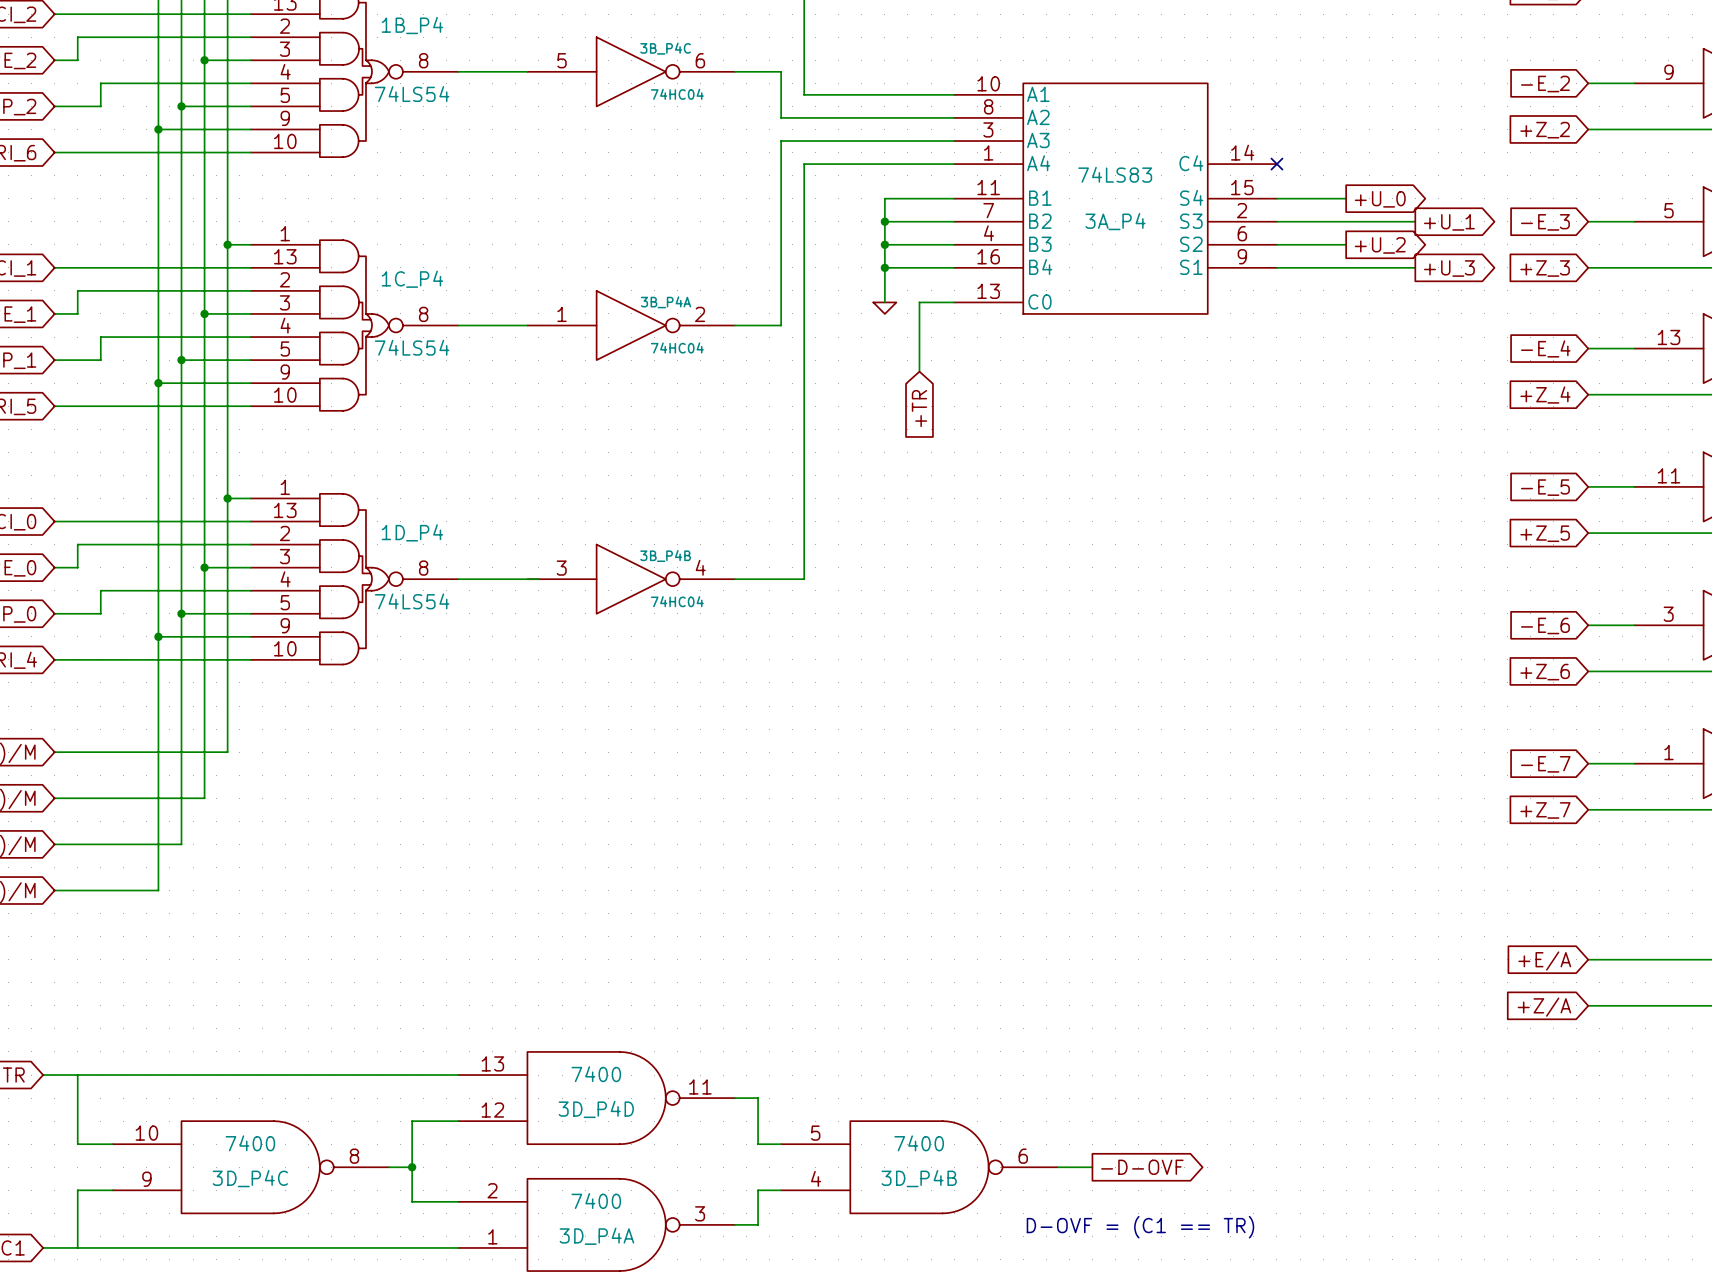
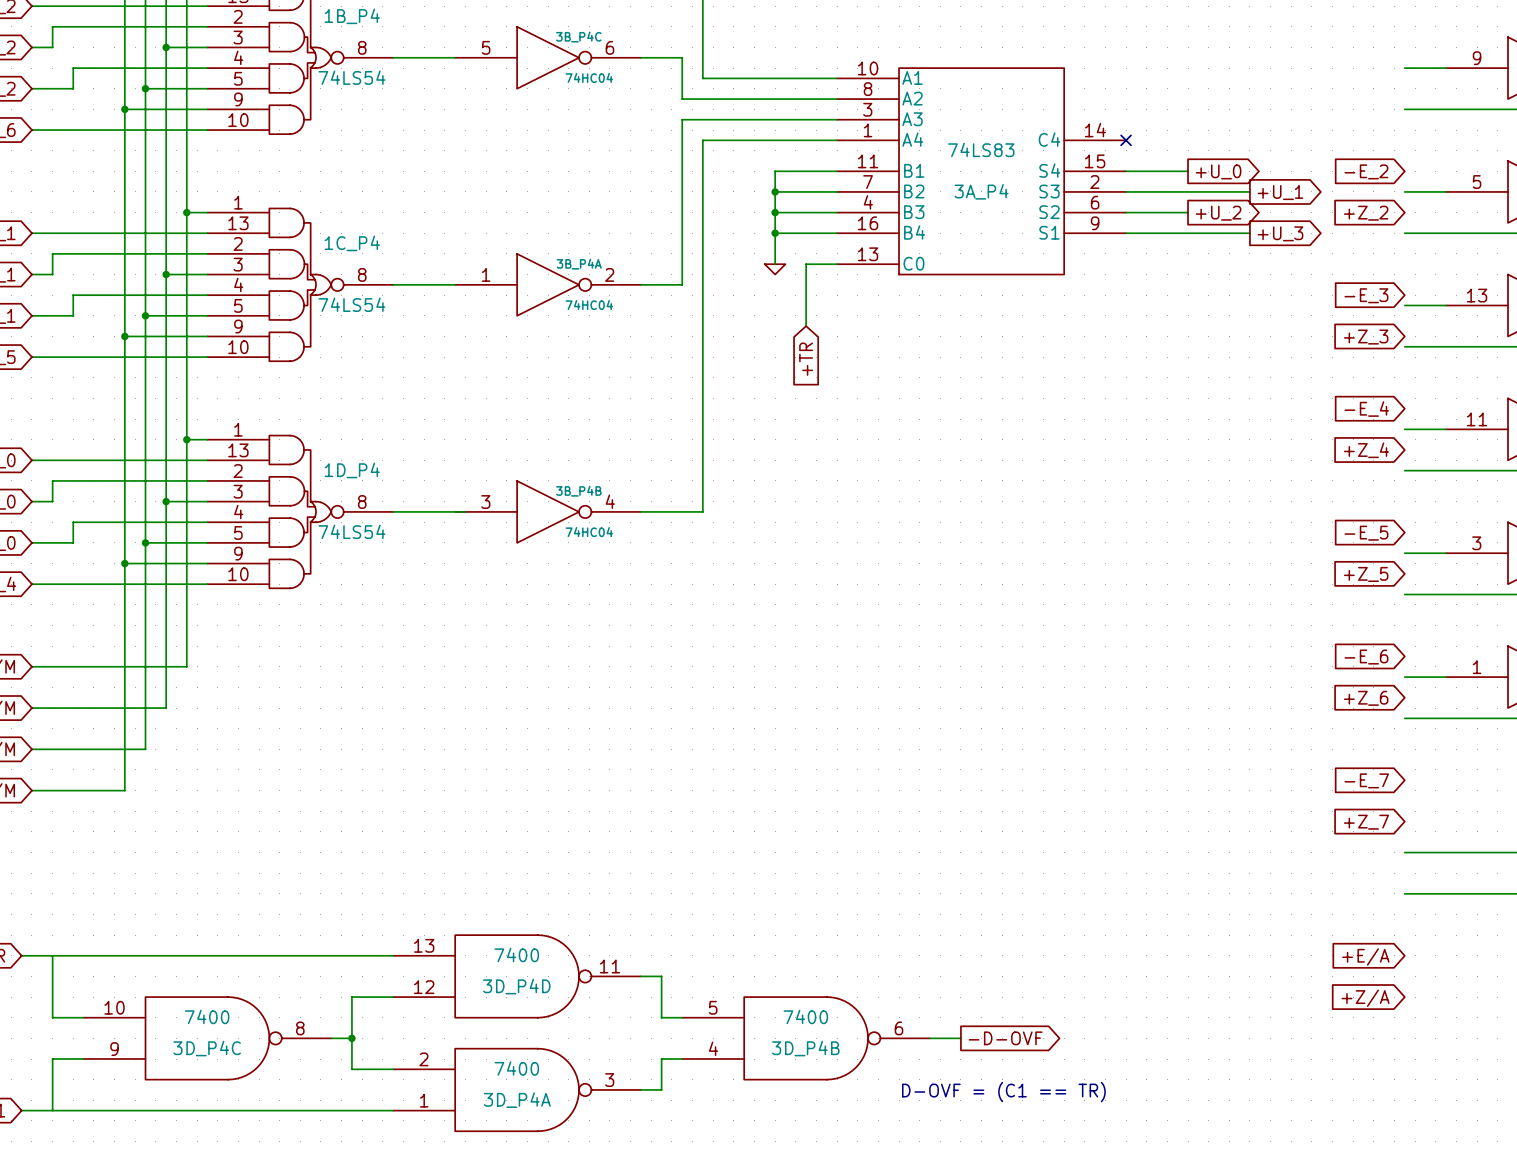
global label position: -E_2 (1545, 84) -> -E_2 (1366, 171)
global label position: +Z_2 (1545, 130) -> +Z_2 (1366, 213)
global label position: -E_3 (1545, 222) -> -E_3 (1366, 295)
global label position: +Z_3 (1545, 268) -> +Z_3 (1366, 337)
global label position: -E_4 (1545, 348) -> -E_4 (1366, 409)
global label position: +Z_4 (1545, 395) -> +Z_4 (1366, 450)
global label position: -E_5 (1545, 487) -> -E_5 (1366, 533)
global label position: +Z_5 (1545, 533) -> +Z_5 (1366, 574)
global label position: -E_6 (1545, 625) -> -E_6 (1366, 657)
global label position: +Z_6 (1545, 672) -> +Z_6 (1366, 698)
global label position: -E_7 (1545, 764) -> -E_7 (1366, 780)
global label position: +Z_7 (1545, 810) -> +Z_7 (1366, 822)
global label position: +E/A (1544, 961) -> +E/A (1365, 956)
global label position: +Z/A (1544, 1007) -> +Z/A (1365, 998)

